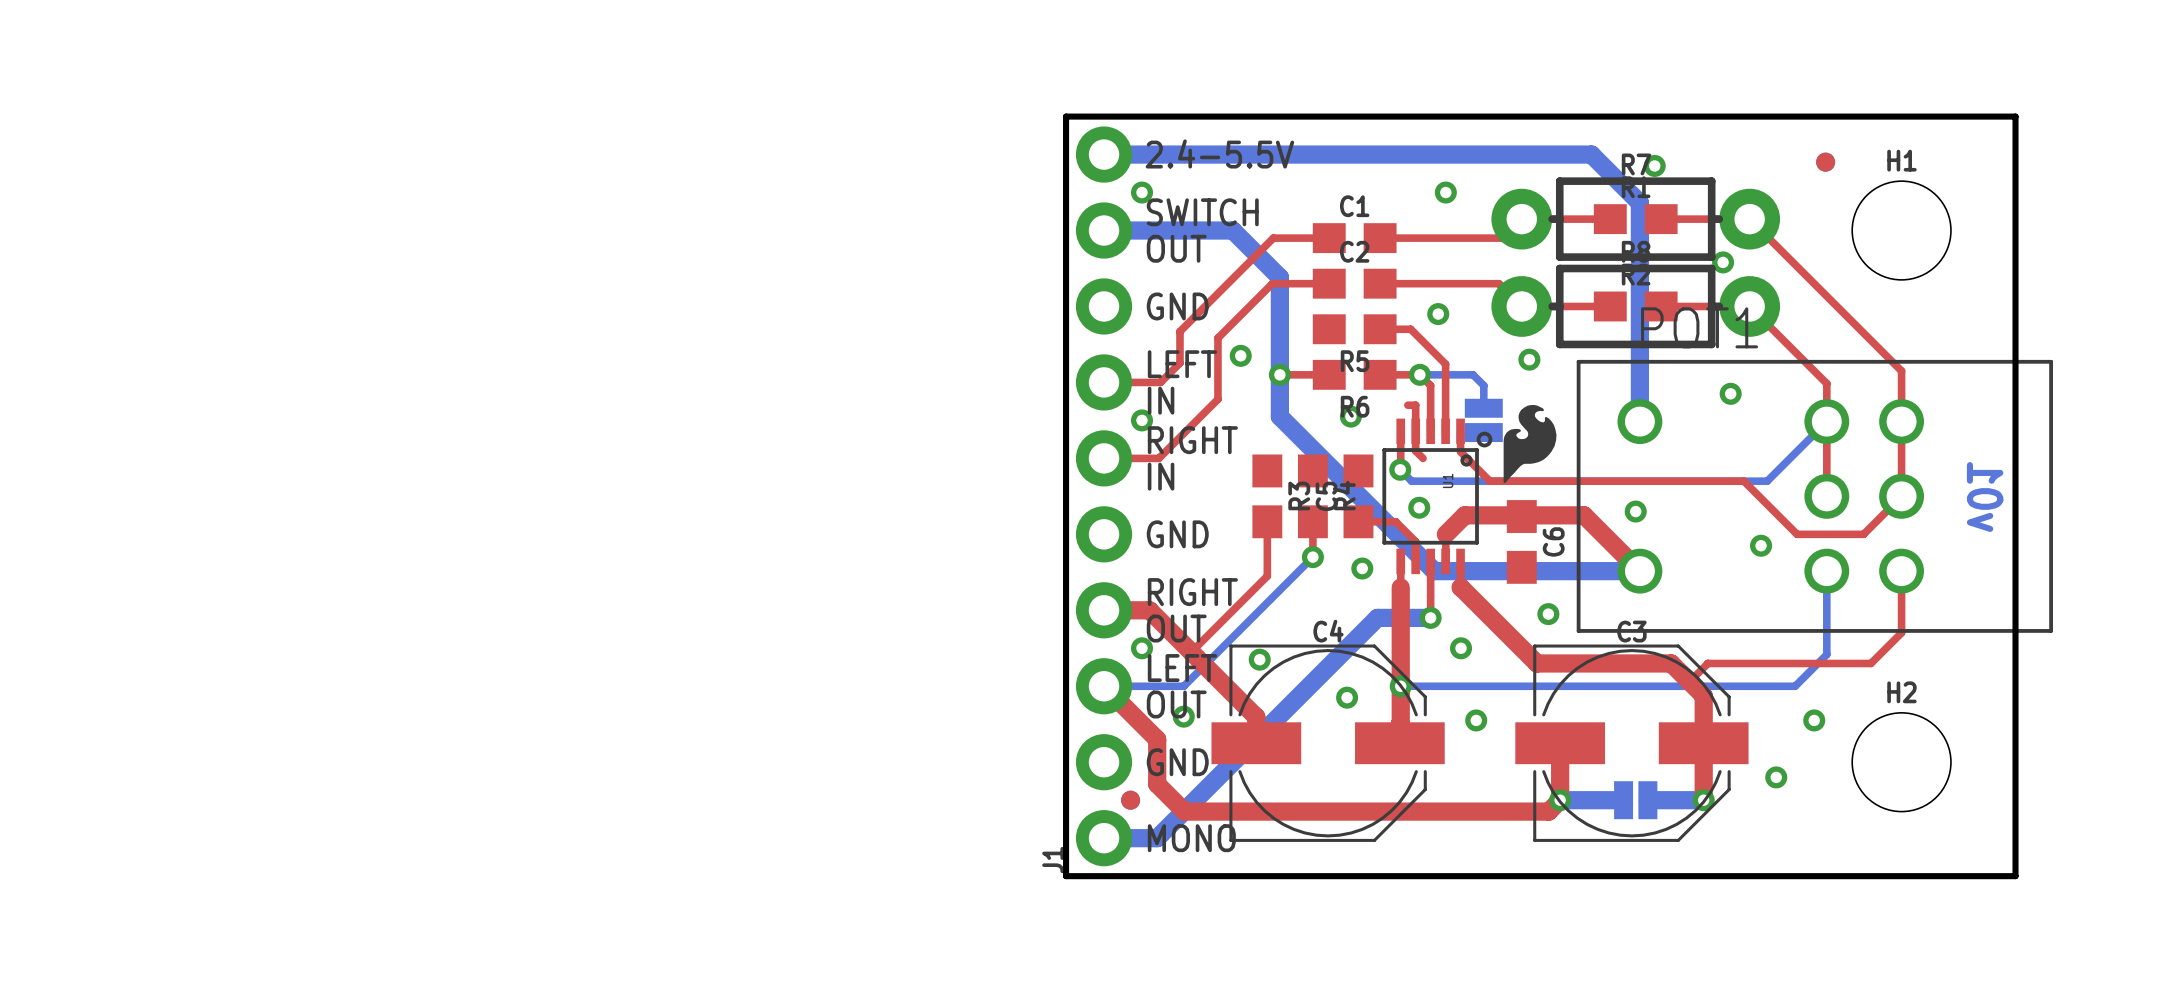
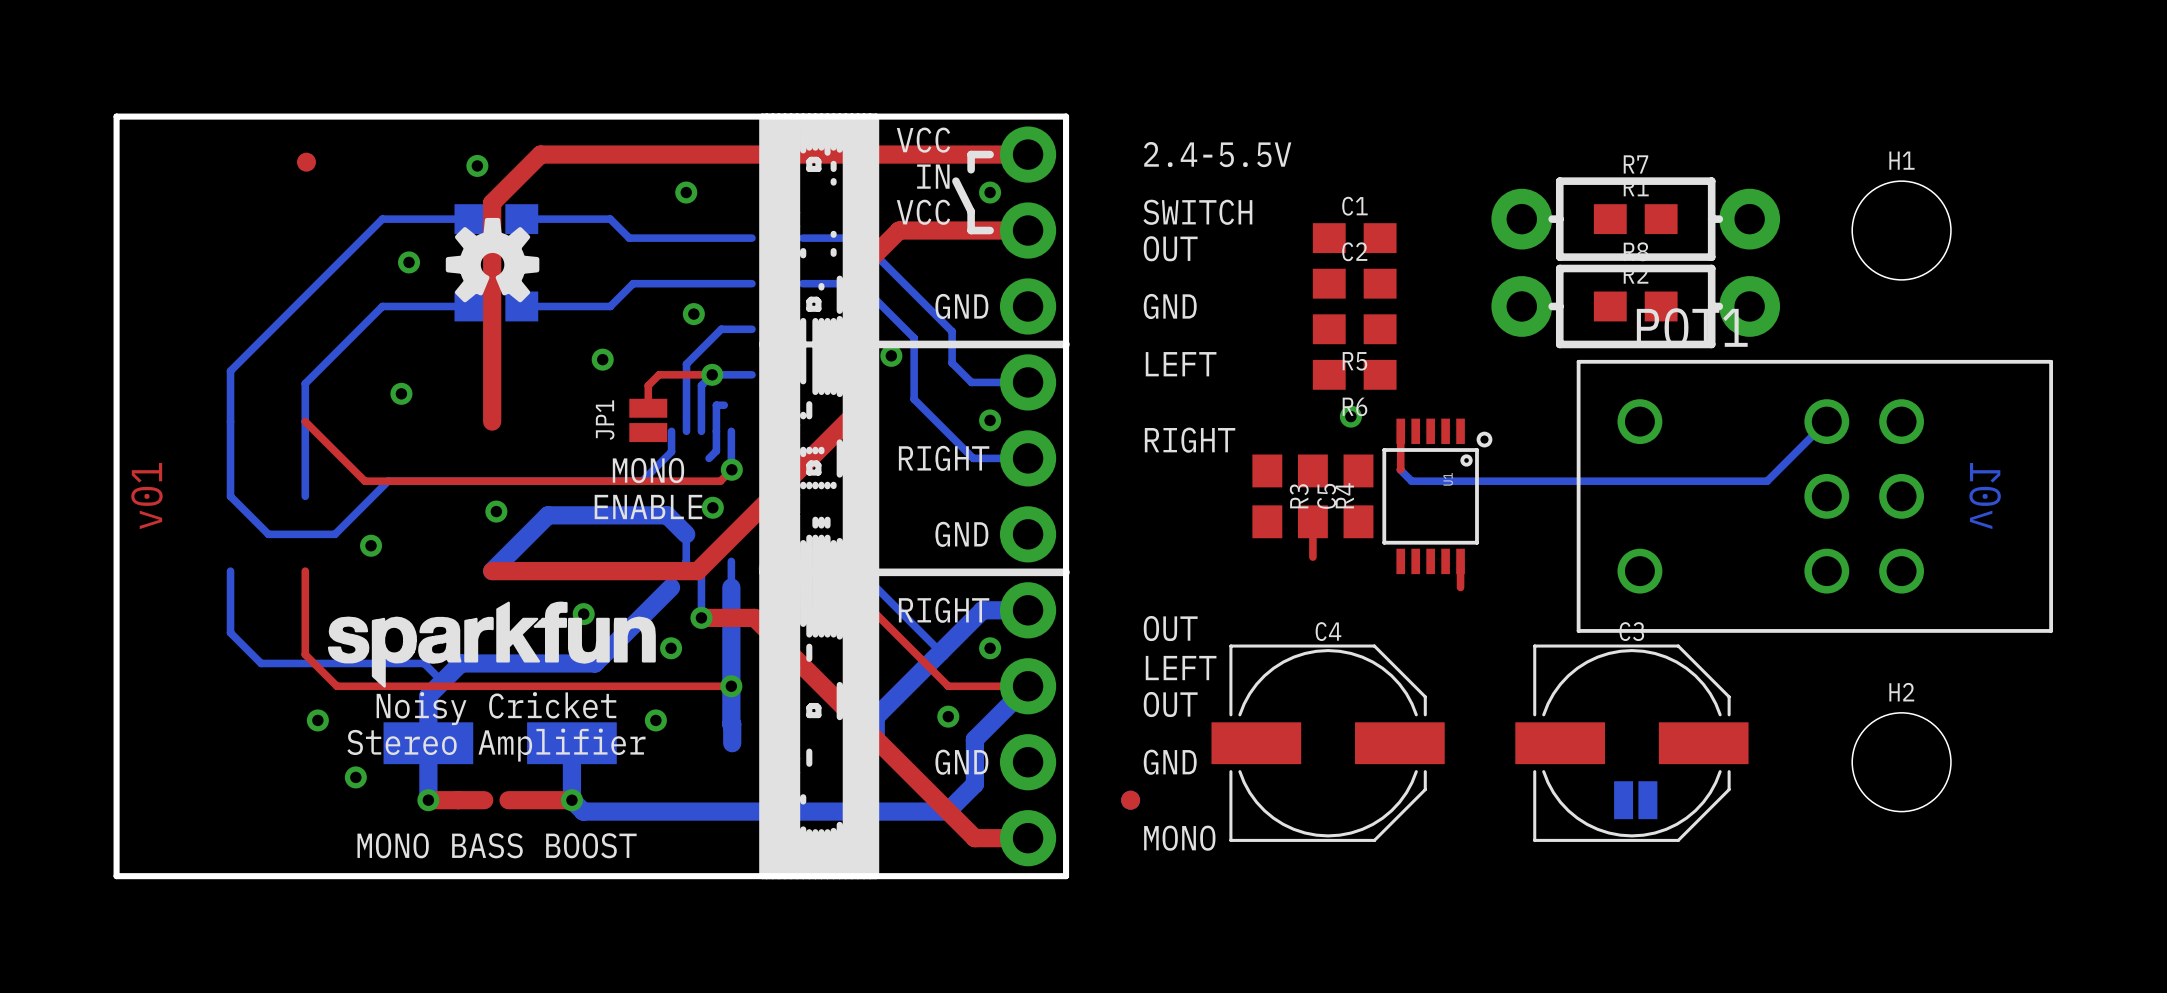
line: none -> (762, 116) (762, 876) (876, 876) (876, 116) (762, 116)
line: none -> (766, 116) (766, 876)
line: none -> (772, 116) (772, 876)
line: none -> (778, 116) (778, 876)
line: none -> (785, 116) (785, 876)
line: none -> (791, 116) (791, 876)
line: none -> (797, 116) (797, 876)
line: none -> (803, 116) (803, 150)
line: none -> (809, 116) (809, 147)
line: none -> (815, 116) (815, 147)
line: none -> (821, 116) (821, 147)
line: none -> (827, 116) (827, 152)
line: none -> (833, 116) (833, 147)
line: none -> (839, 116) (839, 149)
line: none -> (845, 116) (845, 876)
line: none -> (851, 116) (851, 876)
line: none -> (857, 116) (857, 876)
line: none -> (864, 116) (864, 876)
line: none -> (870, 116) (870, 876)
board edge: (1066, 116) (2015, 116) (2015, 876) (1066, 876) -> (1066, 116) (116, 116) (116, 876) (1066, 876)
text: none -> VCC (923, 140)
line: none -> (990, 154) (971, 154) (971, 169)
top track: none -> (1028, 154) (540, 154) (492, 202) (492, 421)
bottom track: (1104, 154) (1591, 154) (1639, 202) (1639, 421) -> none
line: none -> (811, 159) (809, 168) (818, 168) (818, 161) (811, 159)
part: none -> (306, 162)
part: (1825, 162) -> none
line: none -> (833, 163) (833, 168)
via: none -> (477, 165)
via: (1654, 165) -> none
text: none -> IN (933, 176)
line: none -> (833, 181) (833, 182)
line: none -> (955, 181) (971, 211) (971, 230) (990, 230)
via: none -> (686, 192)
via: none -> (990, 192)
via: (1142, 192) -> none
via: (1445, 192) -> none
text: none -> VCC (923, 212)
drawing: none -> [445, 217, 540, 303]
bottom track: none -> (470, 219) (382, 219) (230, 371) (230, 496) (268, 534) (335, 534) (388, 481) (642, 481) (671, 451) (671, 431)
part: none -> (496, 219)
bottom track: none -> (521, 219) (610, 219) (629, 238) (751, 238)
top track: (1610, 219) (1521, 219) (1502, 238) (1380, 238) -> none
top track: (1661, 219) (1749, 219) (1901, 371) (1901, 496) (1863, 534) (1797, 534) (1743, 481) (1489, 481) (1460, 451) (1460, 431) -> none
top track: none -> (1028, 230) (899, 230) (852, 277) (852, 416) (697, 571) (492, 571)
bottom track: (1104, 230) (1232, 230) (1279, 277) (1279, 416) (1434, 571) (1639, 571) -> none
line: none -> (833, 233) (833, 234)
bottom track: none -> (802, 238) (858, 238) (952, 331) (952, 363) (971, 382) (1028, 382)
top track: (1329, 238) (1273, 238) (1179, 331) (1179, 363) (1160, 382) (1104, 382) -> none
line: none -> (803, 251) (803, 255)
line: none -> (833, 251) (833, 253)
via: none -> (409, 262)
via: (1723, 262) -> none
line: none -> (839, 278) (839, 310)
bottom track: none -> (751, 283) (633, 283) (610, 306) (521, 306)
bottom track: none -> (802, 283) (859, 283) (914, 338) (914, 399) (973, 458) (1028, 458)
top track: (1329, 283) (1272, 283) (1217, 338) (1217, 399) (1158, 458) (1104, 458) -> none
top track: (1380, 283) (1499, 283) (1521, 306) (1610, 306) -> none
line: none -> (821, 286) (821, 287)
line: none -> (811, 299) (809, 308) (818, 308) (818, 301) (811, 299)
bottom track: none -> (470, 306) (382, 306) (305, 383) (305, 496)
part: none -> (496, 306)
text: none -> GND (961, 306)
top track: (1661, 306) (1749, 306) (1826, 383) (1826, 496) -> none
via: none -> (693, 314)
via: (1438, 314) -> none
line: none -> (839, 318) (839, 394)
line: none -> (803, 320) (803, 381)
line: none -> (815, 320) (815, 392)
line: none -> (821, 320) (821, 392)
line: none -> (827, 320) (827, 392)
line: none -> (833, 320) (833, 392)
bottom track: none -> (751, 329) (721, 329) (686, 364) (686, 431)
top track: (1380, 329) (1410, 329) (1445, 364) (1445, 431) -> none
line: none -> (762, 344) (1066, 344)
via: none -> (891, 355)
via: (1240, 355) -> none
via: none -> (602, 359)
via: (1529, 359) -> none
top track: none -> (712, 374) (659, 374) (648, 385) (648, 408)
via: none -> (712, 374)
bottom track: none -> (751, 374) (712, 374) (701, 385) (701, 431)
top track: (1279, 374) (1329, 374) -> none
via: (1279, 374) -> none
top track: (1380, 374) (1419, 374) (1430, 385) (1430, 431) -> none
bottom track: (1419, 374) (1473, 374) (1483, 385) (1483, 408) -> none
via: (1419, 374) -> none
via: none -> (401, 393)
via: (1730, 393) -> none
text: IN (1161, 400) -> none
line: none -> (809, 404) (809, 416)
bottom track: none -> (724, 405) (716, 405) (716, 451) (709, 458)
top track: (1407, 405) (1415, 405) (1415, 451) (1423, 458) -> none
drawing: [1503, 405, 1557, 483] -> none
line: none -> (803, 414) (803, 416)
JP1: none -> (648, 420)
via: none -> (990, 420)
via: (1142, 420) -> none
part: (1483, 420) -> none
top track: none -> (305, 421) (364, 481) (720, 481) (731, 469)
bottom track: none -> (731, 431) (731, 469)
line: none -> (839, 442) (839, 474)
line: none -> (803, 449) (803, 454)
line: none -> (809, 449) (809, 451)
line: none -> (815, 449) (815, 451)
line: none -> (821, 449) (821, 451)
text: none -> RIGHT (944, 458)
line: none -> (811, 463) (809, 472) (818, 472) (818, 465) (811, 463)
via: none -> (731, 469)
via: (1400, 469) -> none
text: none -> MONO (648, 470)
text: IN (1161, 476) -> none
line: none -> (803, 484) (803, 486)
line: none -> (809, 484) (809, 486)
line: none -> (815, 484) (815, 486)
line: none -> (821, 484) (821, 486)
line: none -> (827, 484) (827, 486)
line: none -> (833, 484) (833, 486)
J1 position: (1104, 496) -> (1028, 496)
text: none -> v01 (146, 496)
text: none -> ENABLE (648, 507)
via: none -> (712, 507)
via: (1419, 507) -> none
via: none -> (496, 511)
via: (1635, 511) -> none
line: none -> (815, 519) (815, 525)
line: none -> (821, 519) (821, 525)
line: none -> (827, 519) (827, 525)
bottom track: none -> (864, 521) (864, 576) (940, 652)
top track: (1267, 521) (1267, 576) (1191, 652) -> none
top track: (1358, 521) (1395, 521) (1415, 541) (1415, 561) -> none
text: none -> GND (961, 534)
text: GND (1177, 534) -> none
line: none -> (809, 537) (809, 634)
line: none -> (815, 537) (815, 634)
line: none -> (821, 537) (821, 634)
line: none -> (827, 537) (827, 634)
line: none -> (839, 540) (839, 636)
C6: (1521, 541) -> none
line: none -> (803, 543) (803, 623)
line: none -> (833, 543) (833, 634)
via: none -> (371, 545)
via: (1761, 545) -> none
top track: none -> (819, 557) (948, 686) (1028, 686)
bottom track: (1312, 557) (1183, 686) (1104, 686) -> none
via: (1312, 557) -> none
bottom track: none -> (686, 561) (686, 534) (667, 515) (547, 515) (492, 571)
bottom track: none -> (701, 561) (701, 617)
bottom track: none -> (731, 561) (732, 743)
top track: (1400, 561) (1399, 743) -> none
top track: (1430, 561) (1430, 617) -> none
top track: (1445, 561) (1445, 534) (1464, 515) (1584, 515) (1639, 571) -> none
via: (1362, 568) -> none
bottom track: none -> (230, 571) (230, 632) (261, 663) (424, 663) (442, 681)
top track: none -> (305, 571) (305, 654) (336, 686) (731, 686)
bottom track: (1826, 571) (1826, 654) (1795, 686) (1400, 686) -> none
top track: (1901, 571) (1901, 632) (1870, 663) (1707, 663) (1689, 681) -> none
line: none -> (762, 572) (1066, 572)
bottom track: none -> (671, 587) (595, 663) (460, 663) (428, 695) (428, 800)
top track: (1461, 587) (1536, 663) (1671, 663) (1703, 695) (1703, 800) -> none
text: RIGHT (1192, 592) -> none
drawing: none -> [327, 601, 656, 688]
text: none -> RIGHT (944, 610)
bottom track: none -> (1028, 610) (982, 610) (875, 717) (875, 743)
top track: (1104, 610) (1149, 610) (1256, 717) (1256, 743) -> none
via: none -> (583, 614)
via: (1548, 614) -> none
top track: none -> (701, 617) (754, 617) (974, 838) (1028, 838)
via: none -> (701, 617)
bottom track: (1430, 617) (1377, 617) (1157, 838) (1104, 838) -> none
via: (1430, 617) -> none
line: none -> (809, 646) (809, 658)
via: none -> (671, 648)
via: none -> (990, 648)
via: (1142, 648) -> none
via: (1461, 648) -> none
via: (1259, 659) -> none
line: none -> (839, 684) (839, 717)
via: none -> (731, 686)
bottom track: none -> (1028, 686) (974, 739) (974, 784) (947, 811) (583, 811) (571, 800) (571, 743)
top track: (1104, 686) (1157, 739) (1157, 784) (1184, 811) (1548, 811) (1560, 800) (1560, 743) -> none
via: (1400, 686) -> none
via: (1347, 697) -> none
line: none -> (811, 705) (809, 715) (818, 715) (818, 707) (811, 705)
text: none -> Noisy Cricket (496, 708)
via: none -> (948, 716)
via: (1183, 716) -> none
via: none -> (317, 720)
via: none -> (655, 720)
via: (1476, 720) -> none
via: (1814, 720) -> none
part: none -> (500, 743)
text: none -> Stereo Amplifier (496, 745)
line: none -> (809, 751) (809, 763)
text: none -> GND (961, 762)
via: none -> (355, 777)
via: (1776, 777) -> none
line: none -> (803, 797) (803, 801)
top track: none -> (428, 800) (484, 800)
via: none -> (428, 800)
top track: none -> (508, 800) (571, 800)
via: none -> (571, 800)
bottom track: (1560, 800) (1623, 800) -> none
via: (1560, 800) -> none
bottom track: (1647, 800) (1703, 800) -> none
via: (1703, 800) -> none
line: none -> (839, 824) (839, 876)
line: none -> (803, 829) (803, 876)
line: none -> (833, 830) (833, 876)
line: none -> (809, 832) (809, 876)
line: none -> (815, 832) (815, 876)
line: none -> (821, 832) (821, 876)
line: none -> (827, 832) (827, 876)
text: none -> MONO BASS BOOST (497, 845)

